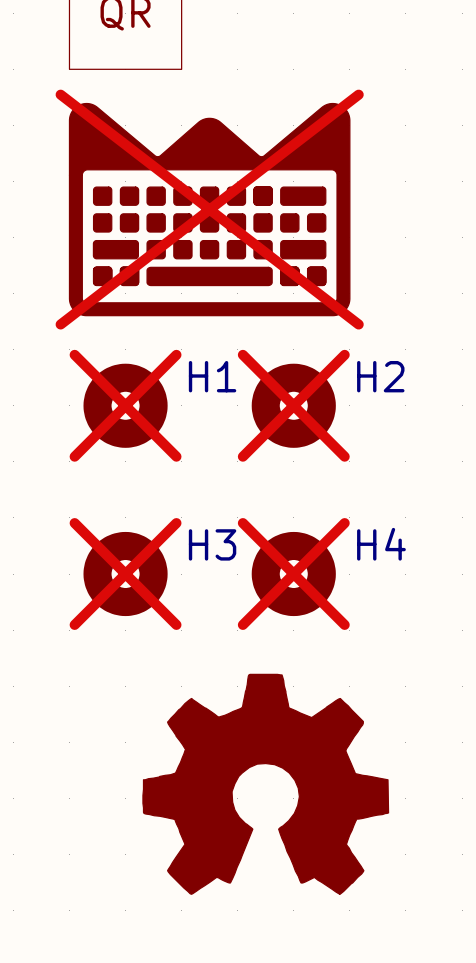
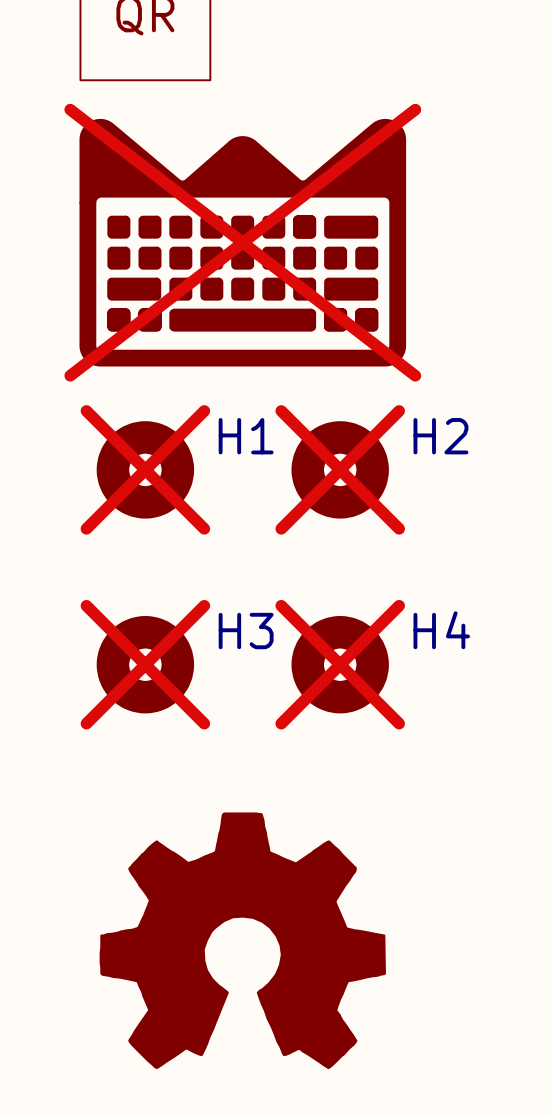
power symbol position: (265, 784) -> (242, 940)

